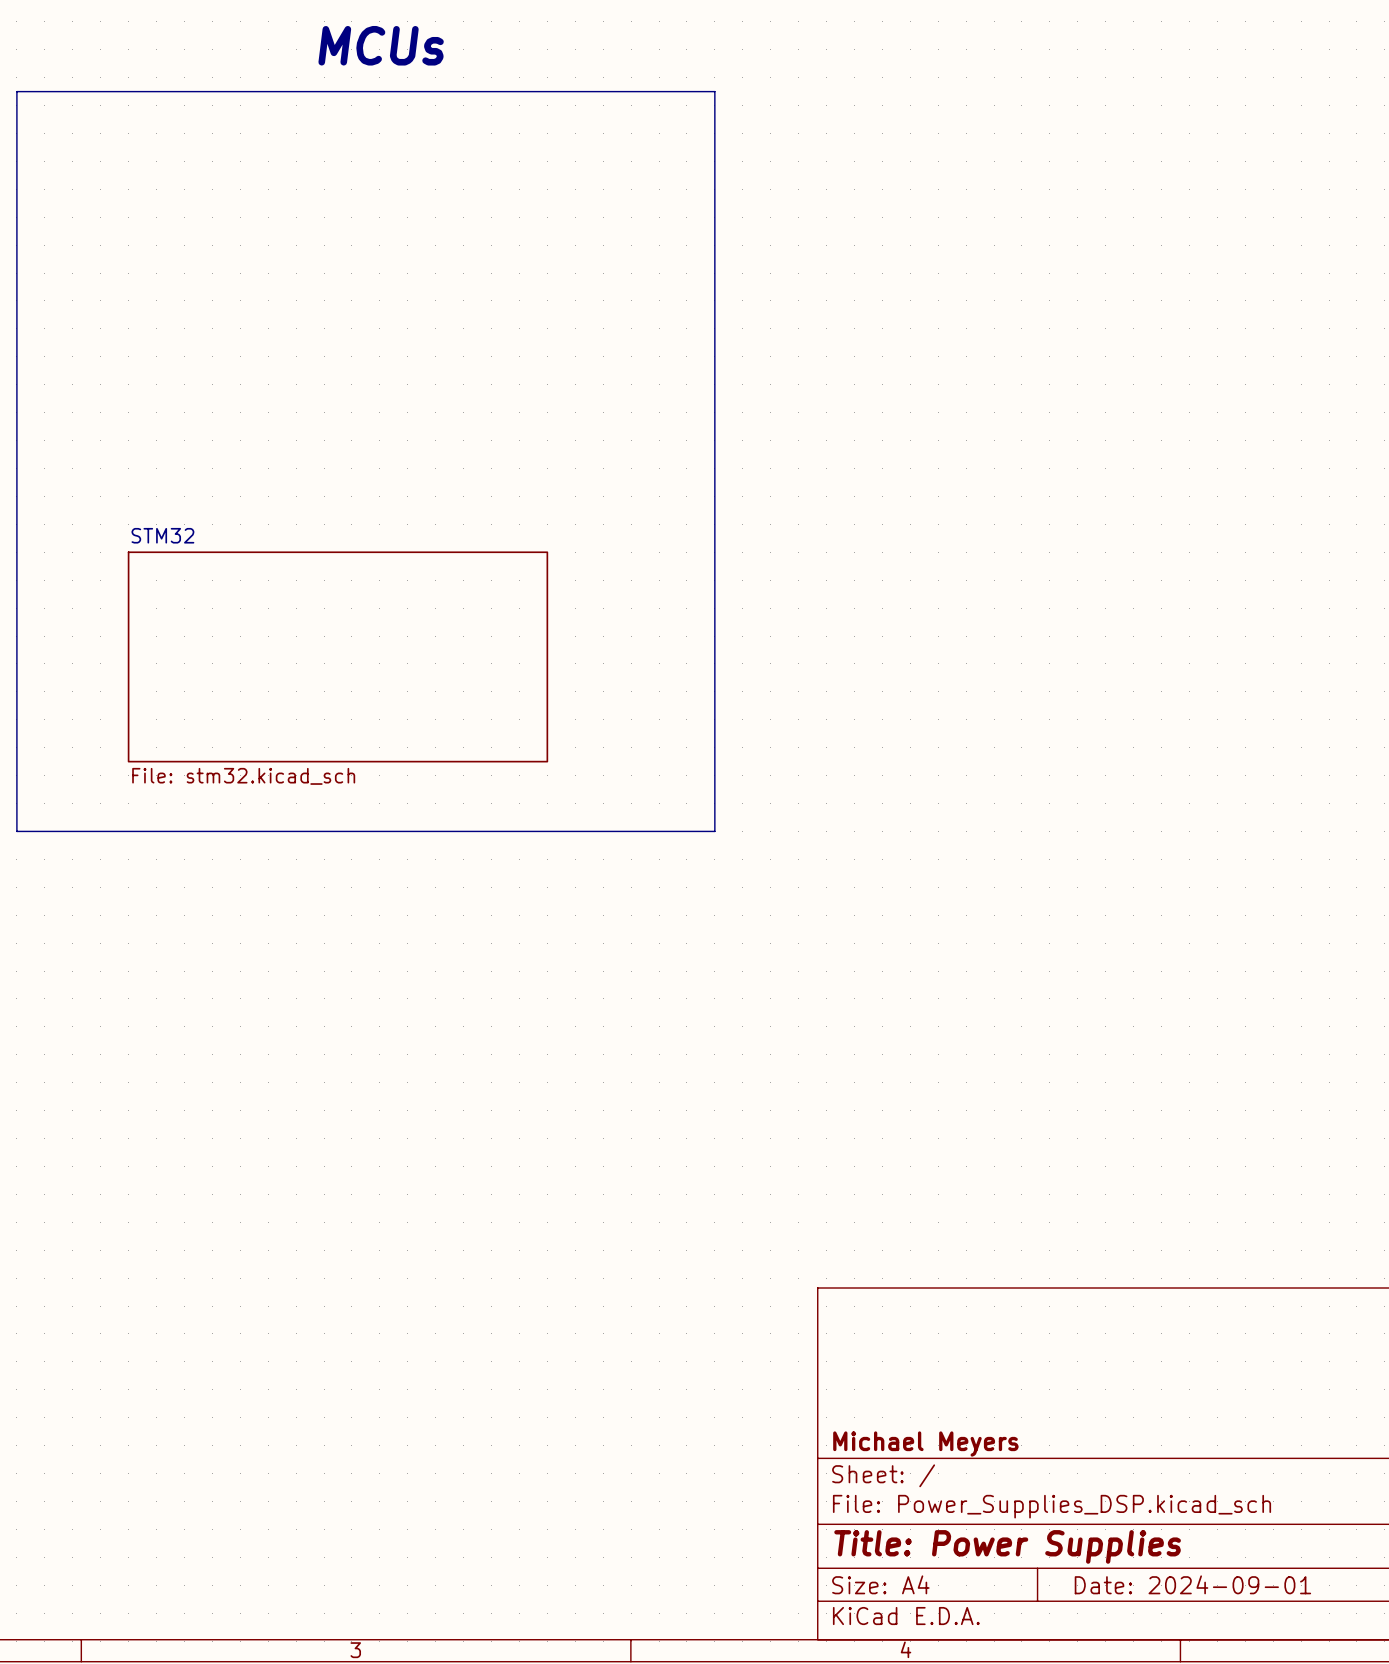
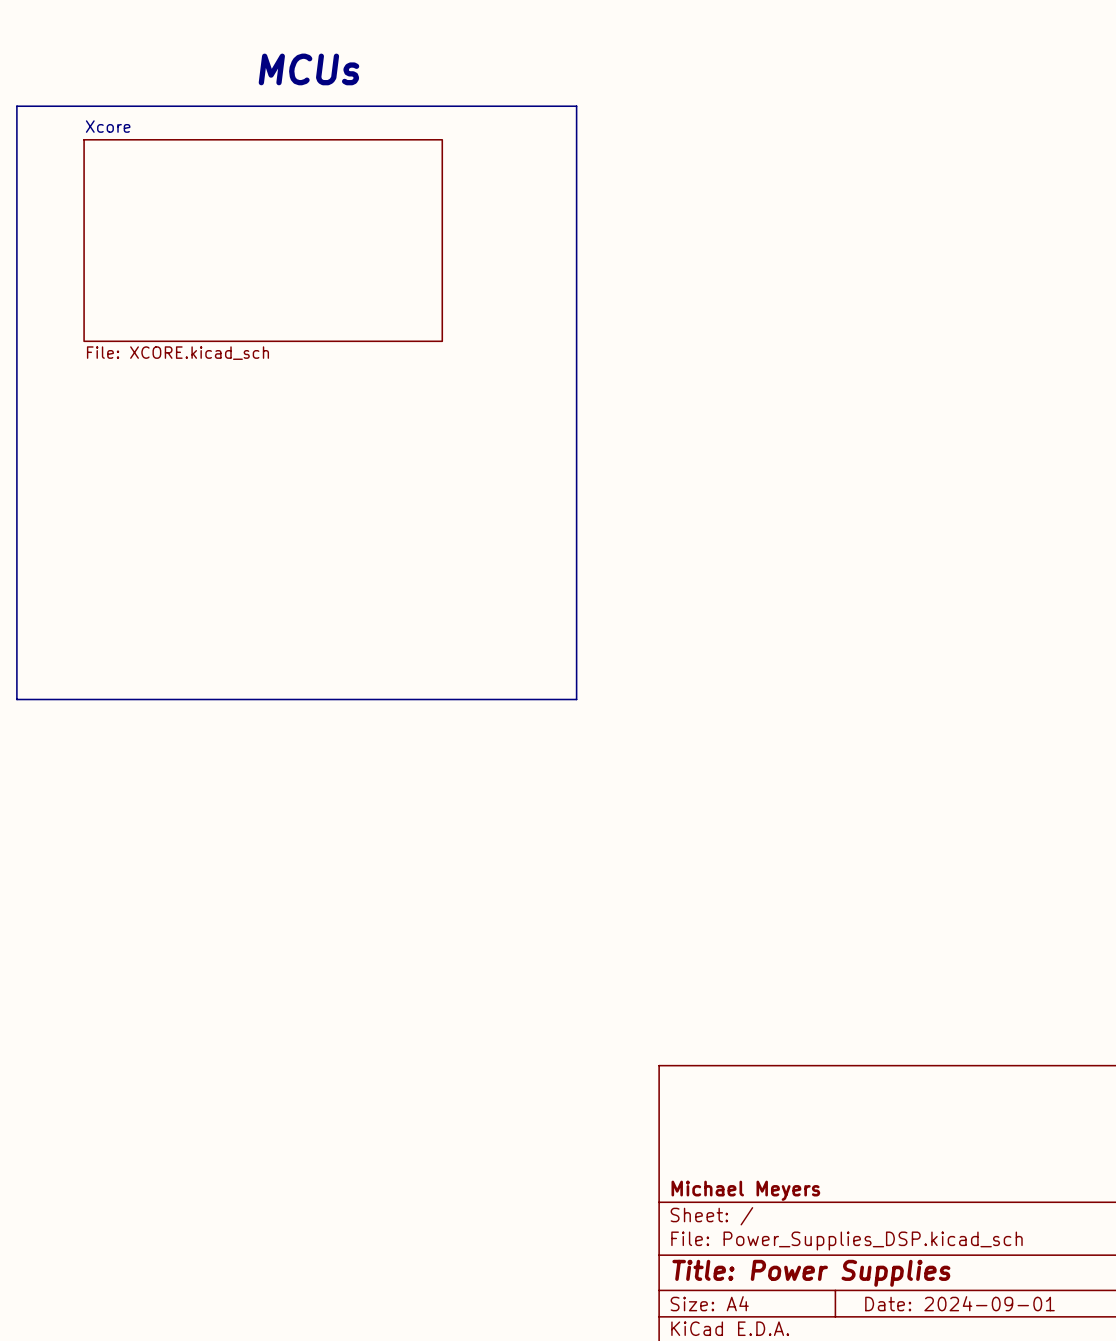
sheet Xcore: none -> File: XCORE.kicad_sch (263, 240)
sheet STM32: File: stm32.kicad_sch (337, 656) -> none

